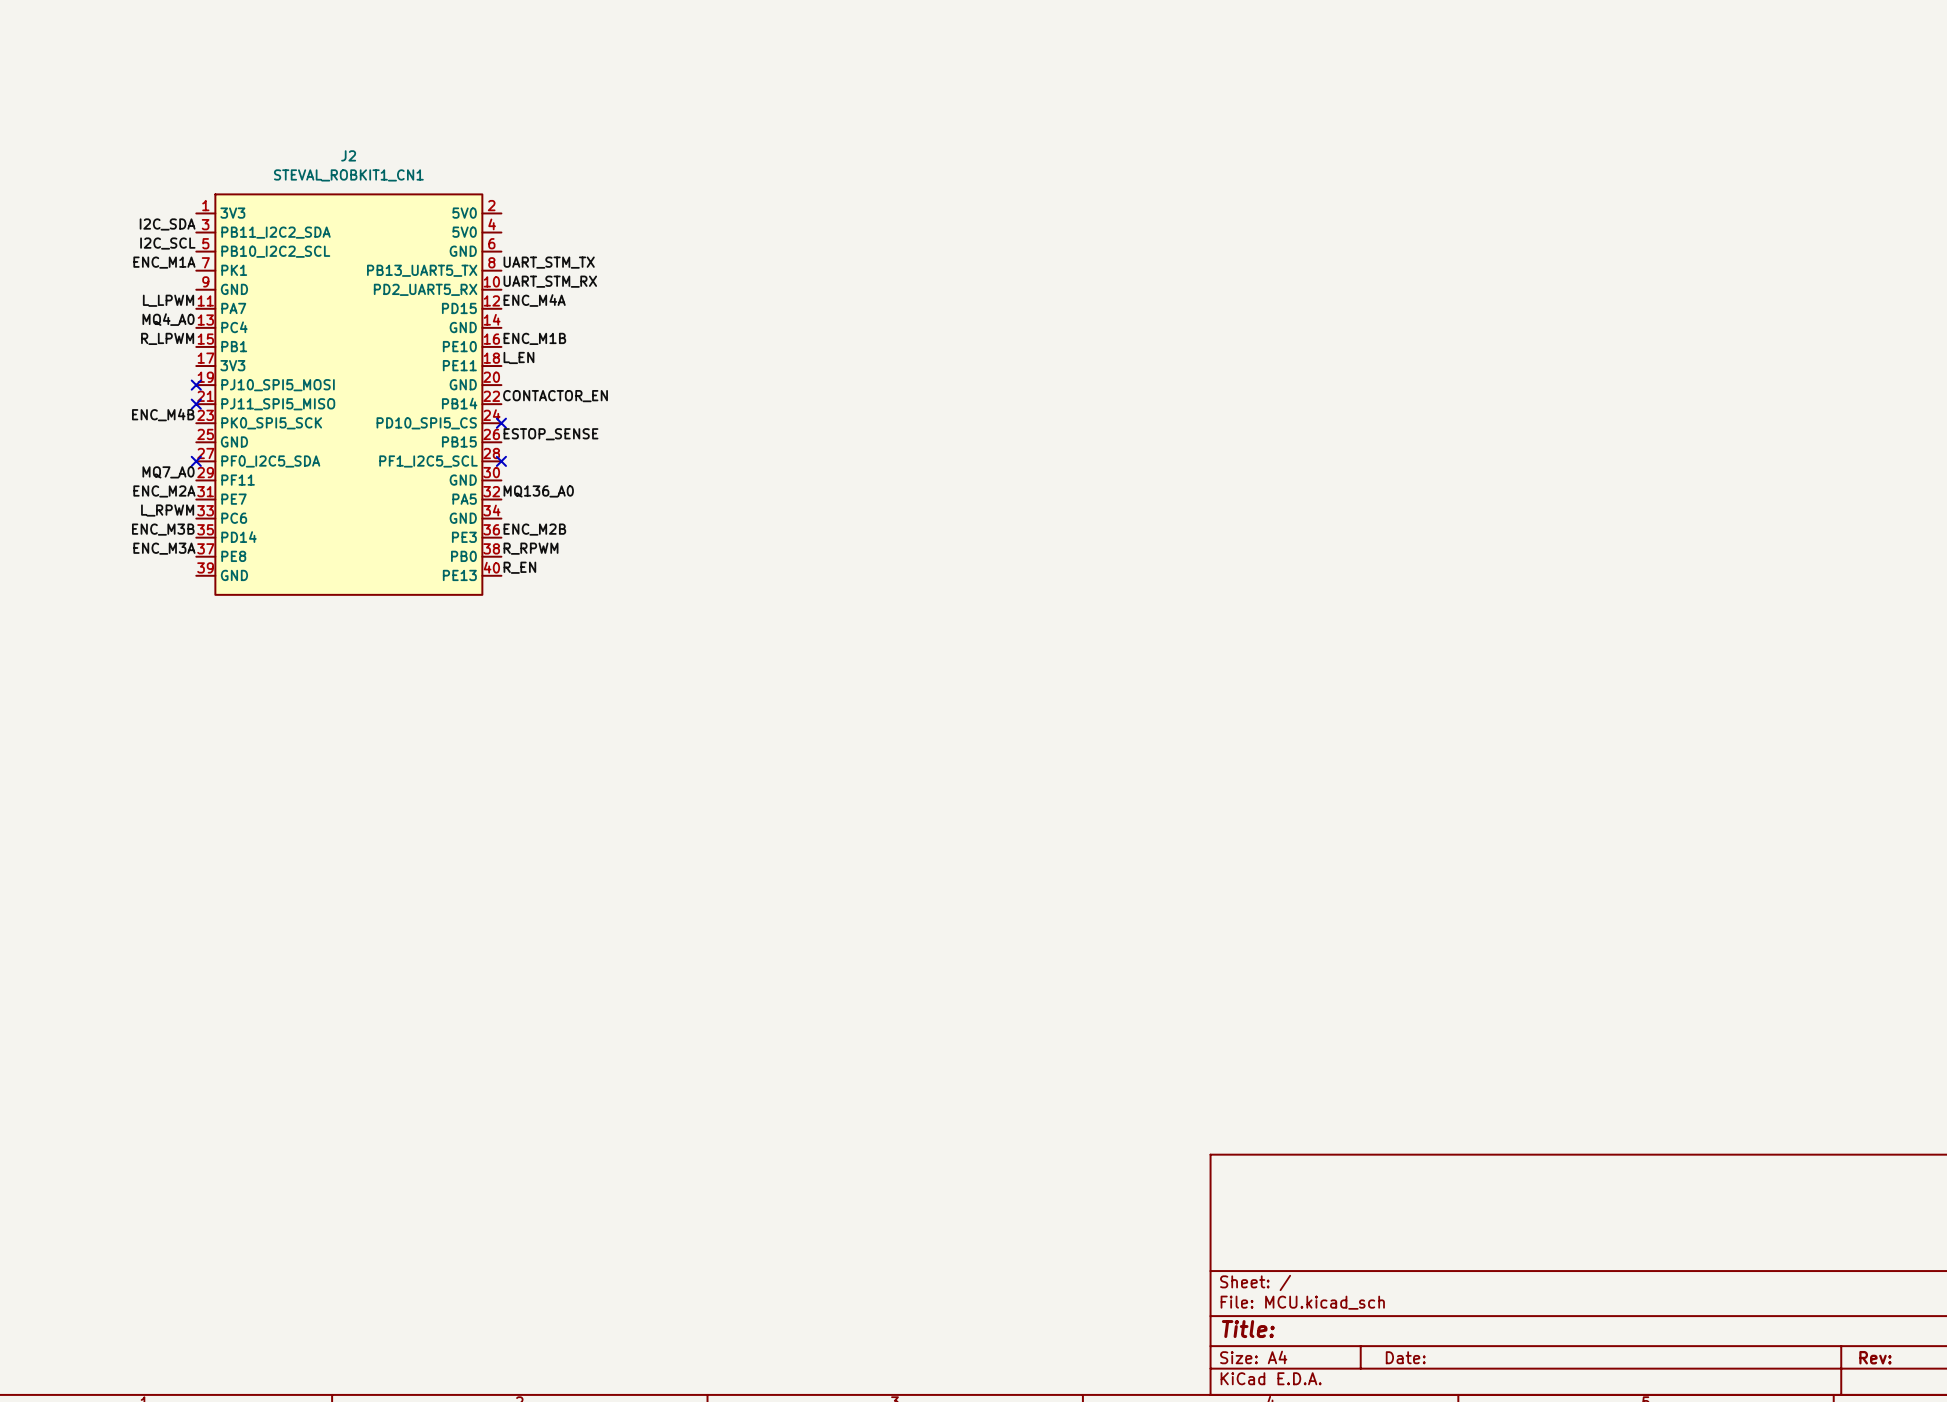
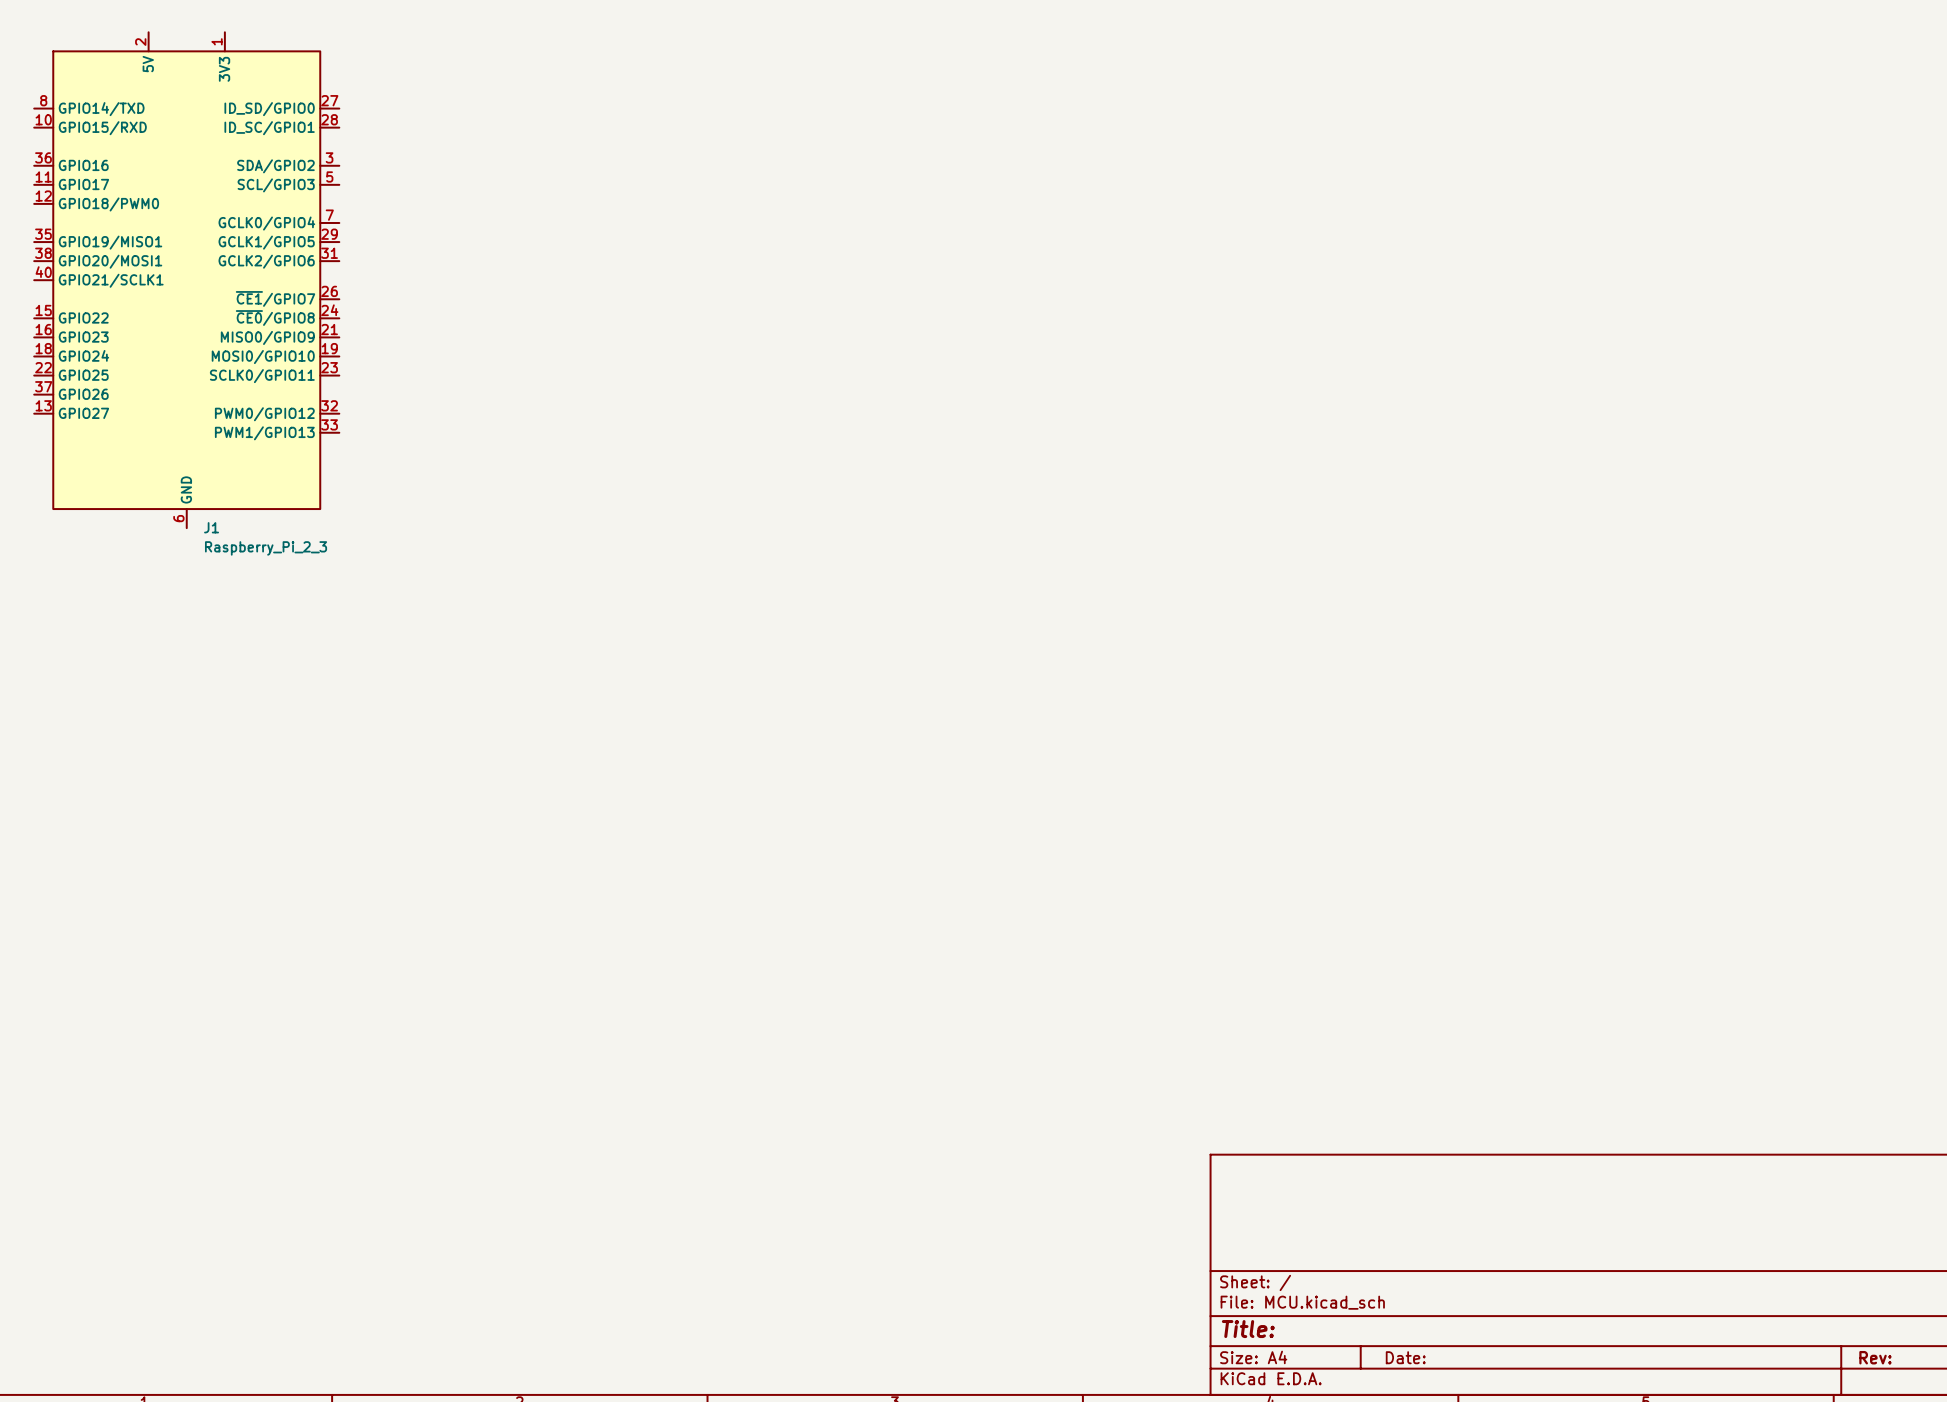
label: I2C_SDA (167, 224) -> none
label: I2C_SCL (167, 243) -> none
label: ENC_M1A (164, 262) -> none
label: UART_STM_TX (549, 262) -> none
J1: none -> Raspberry_Pi_2_3 (186, 280)
label: UART_STM_RX (550, 281) -> none
label: L_LPWM (168, 300) -> none
label: ENC_M4A (534, 300) -> none
label: MQ4_A0 (168, 319) -> none
label: R_LPWM (167, 338) -> none
label: ENC_M1B (534, 338) -> none
label: L_EN (518, 357) -> none
no-connect mark: (196, 385) -> none
J2: STEVAL_ROBKIT1_CN1 (348, 394) -> none
label: CONTACTOR_EN (555, 396) -> none
no-connect mark: (196, 404) -> none
label: ENC_M4B (163, 414) -> none
no-connect mark: (501, 423) -> none
label: ESTOP_SENSE (550, 434) -> none
no-connect mark: (196, 461) -> none
no-connect mark: (501, 461) -> none
label: MQ7_A0 (168, 472) -> none
label: ENC_M2A (164, 491) -> none
label: MQ136_A0 (538, 491) -> none
label: L_RPWM (167, 510) -> none
label: ENC_M3B (163, 529) -> none
label: ENC_M2B (534, 529) -> none
label: ENC_M3A (164, 548) -> none
label: R_RPWM (531, 548) -> none
label: R_EN (519, 567) -> none

